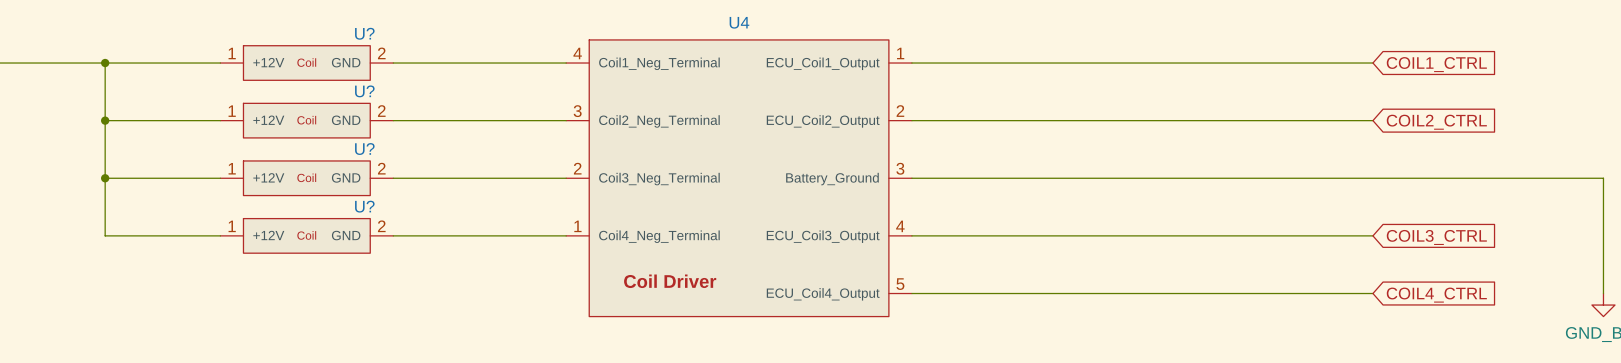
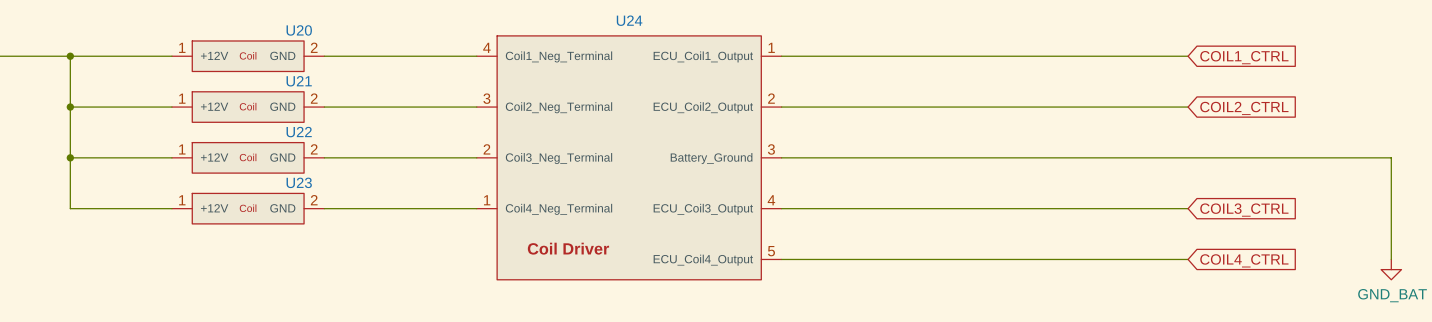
U4 name: U4 (739, 22) -> U24 (629, 20)
U? name: U? (364, 33) -> U20 (299, 30)
U? name: U? (364, 91) -> U21 (299, 81)
U? name: U? (364, 149) -> U22 (299, 132)
U? name: U? (364, 206) -> U23 (299, 182)

